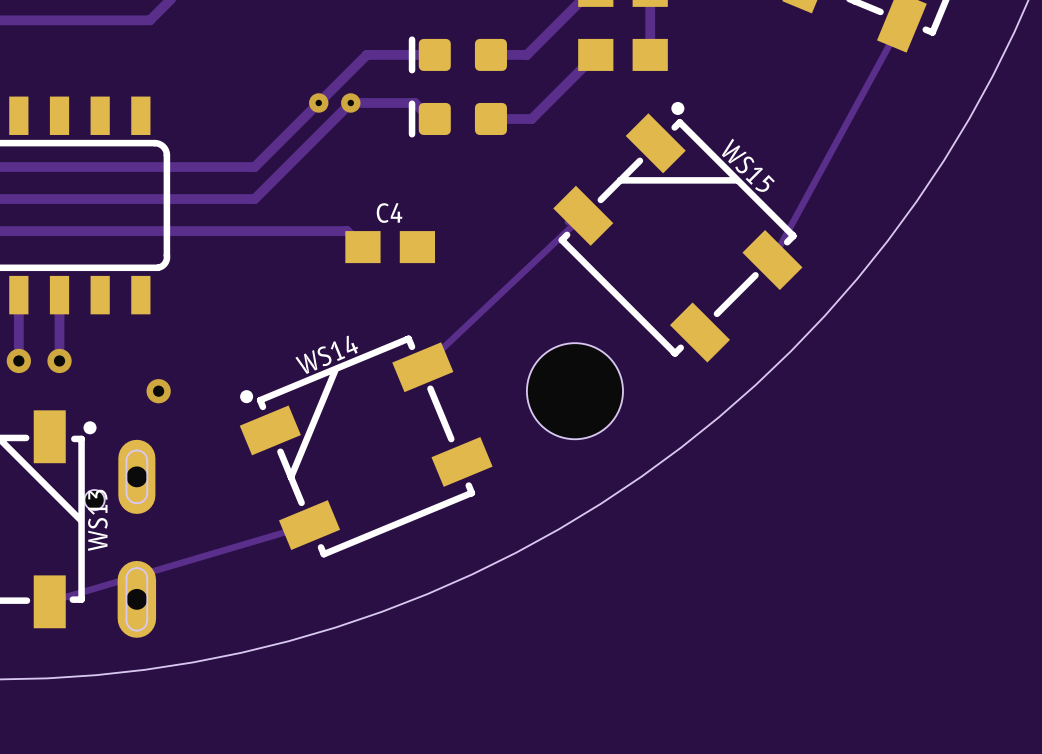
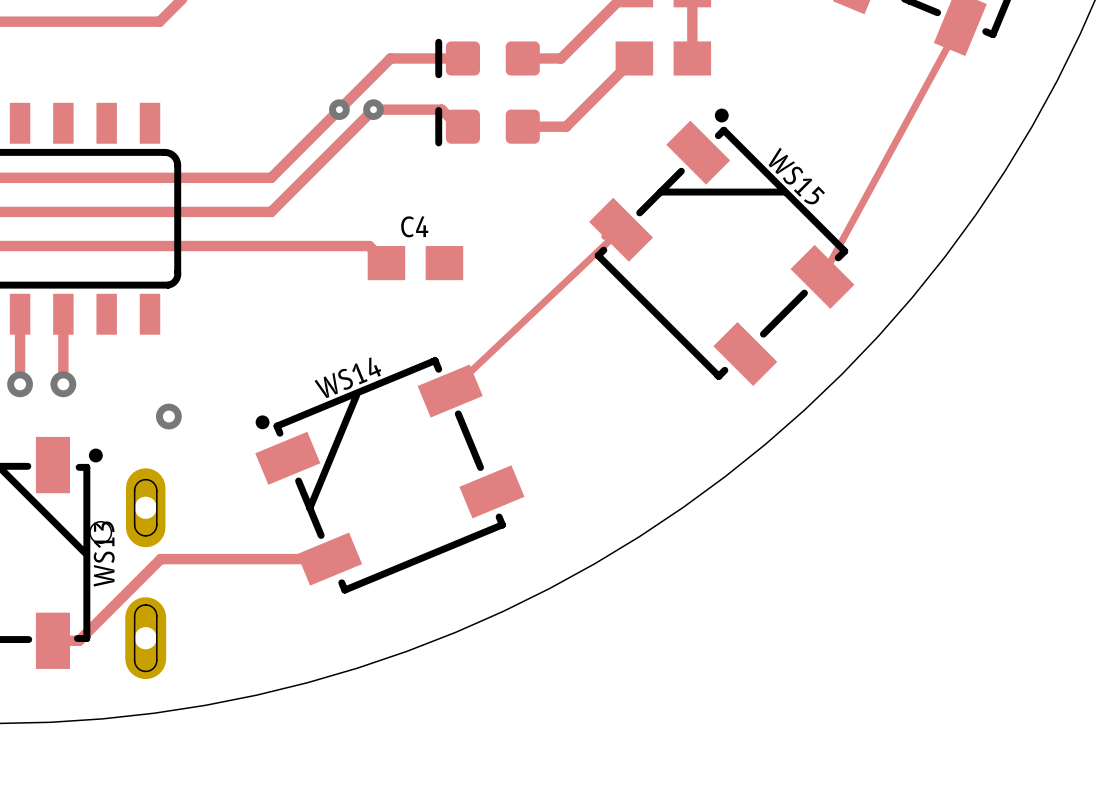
hole: (574, 391) -> none
track: (309, 525) (49, 601) -> (329, 559) (160, 559) (79, 640) (52, 640)

